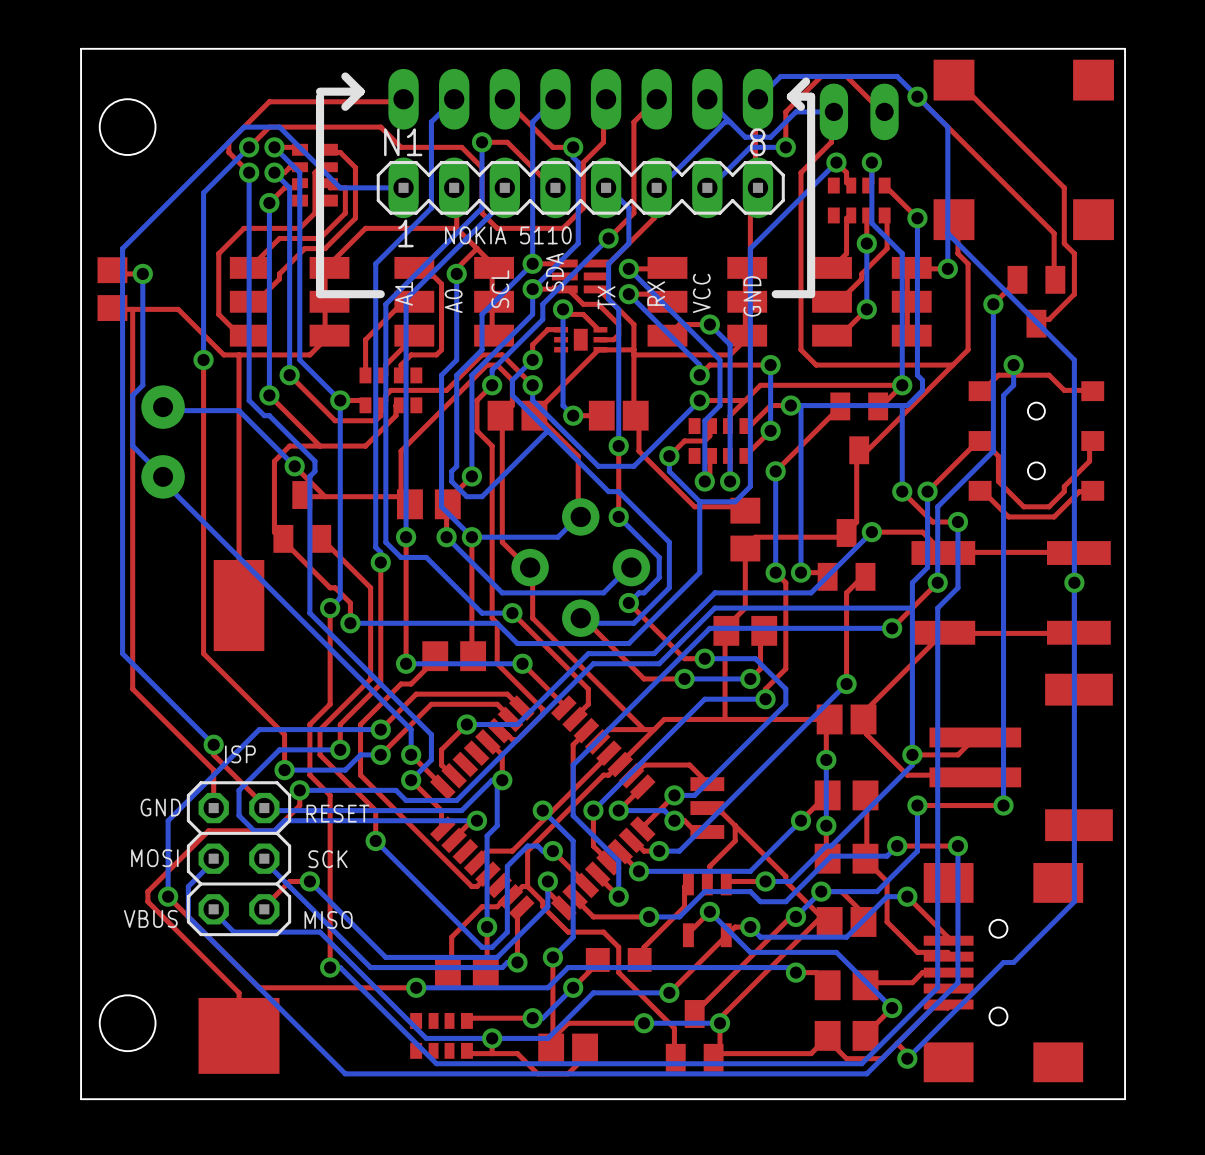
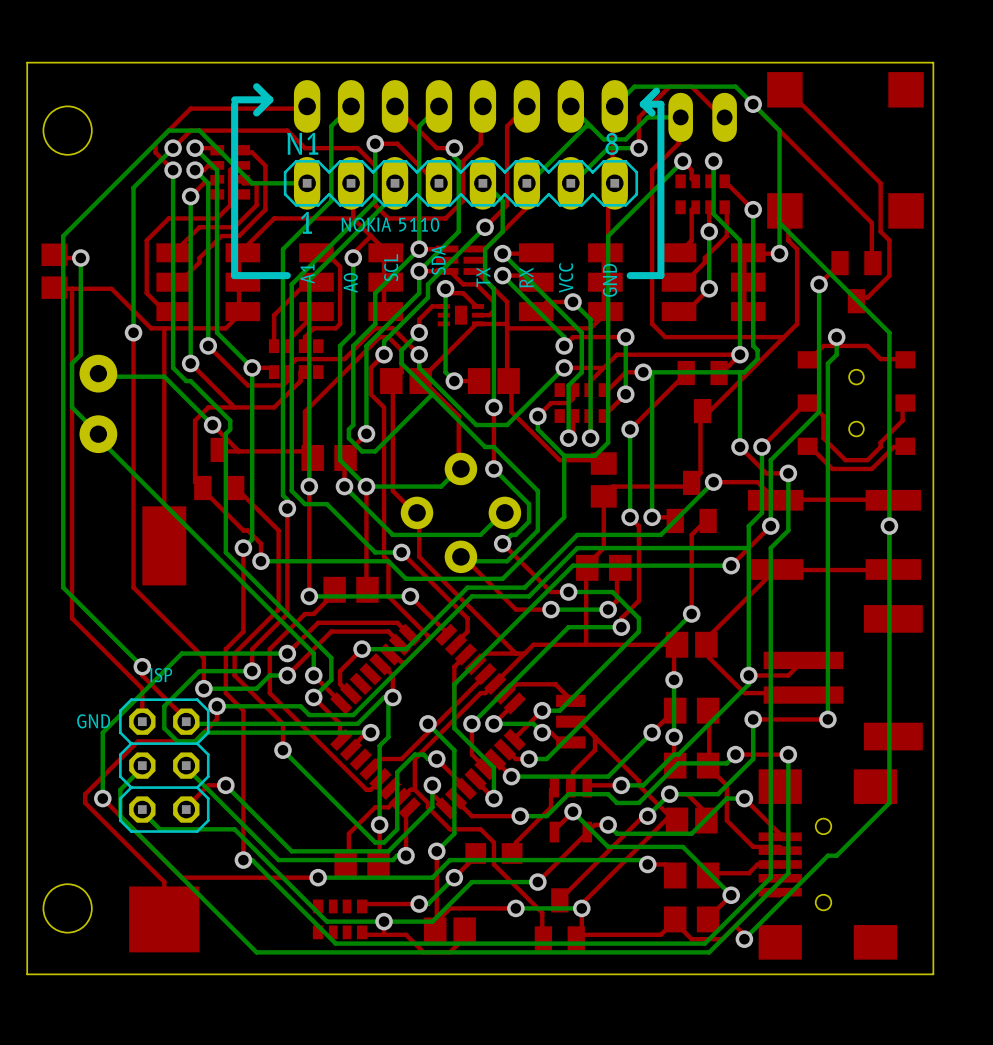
text: RESET (337, 813) -> none
text: MOSI (154, 858) -> none
text: SCK (328, 859) -> none
text: VBUS (150, 918) -> none
text: MISO (328, 919) -> none

